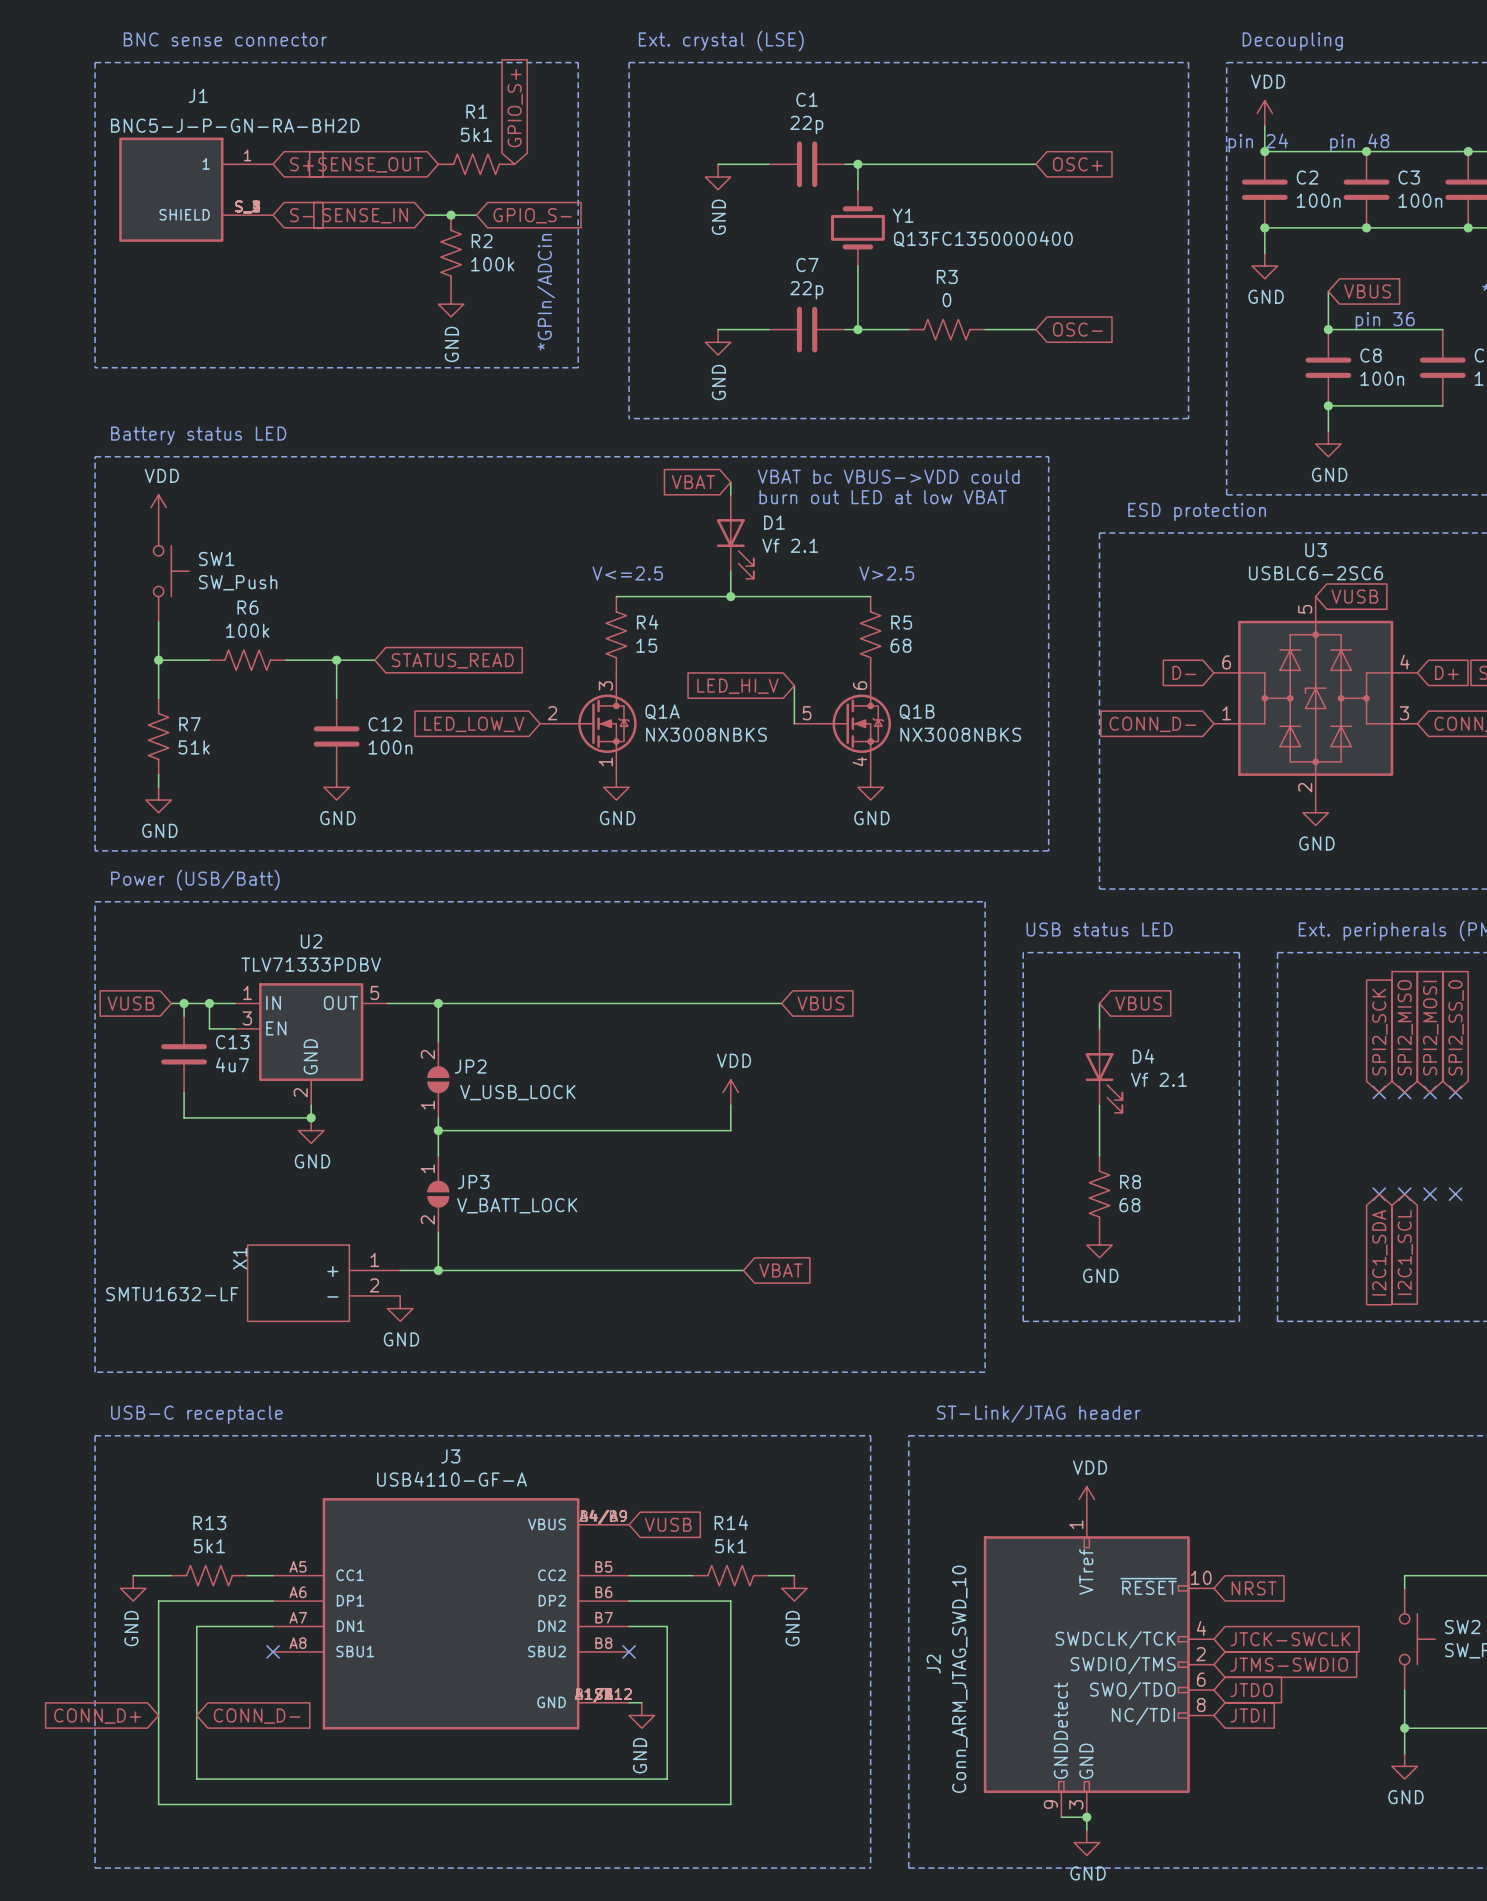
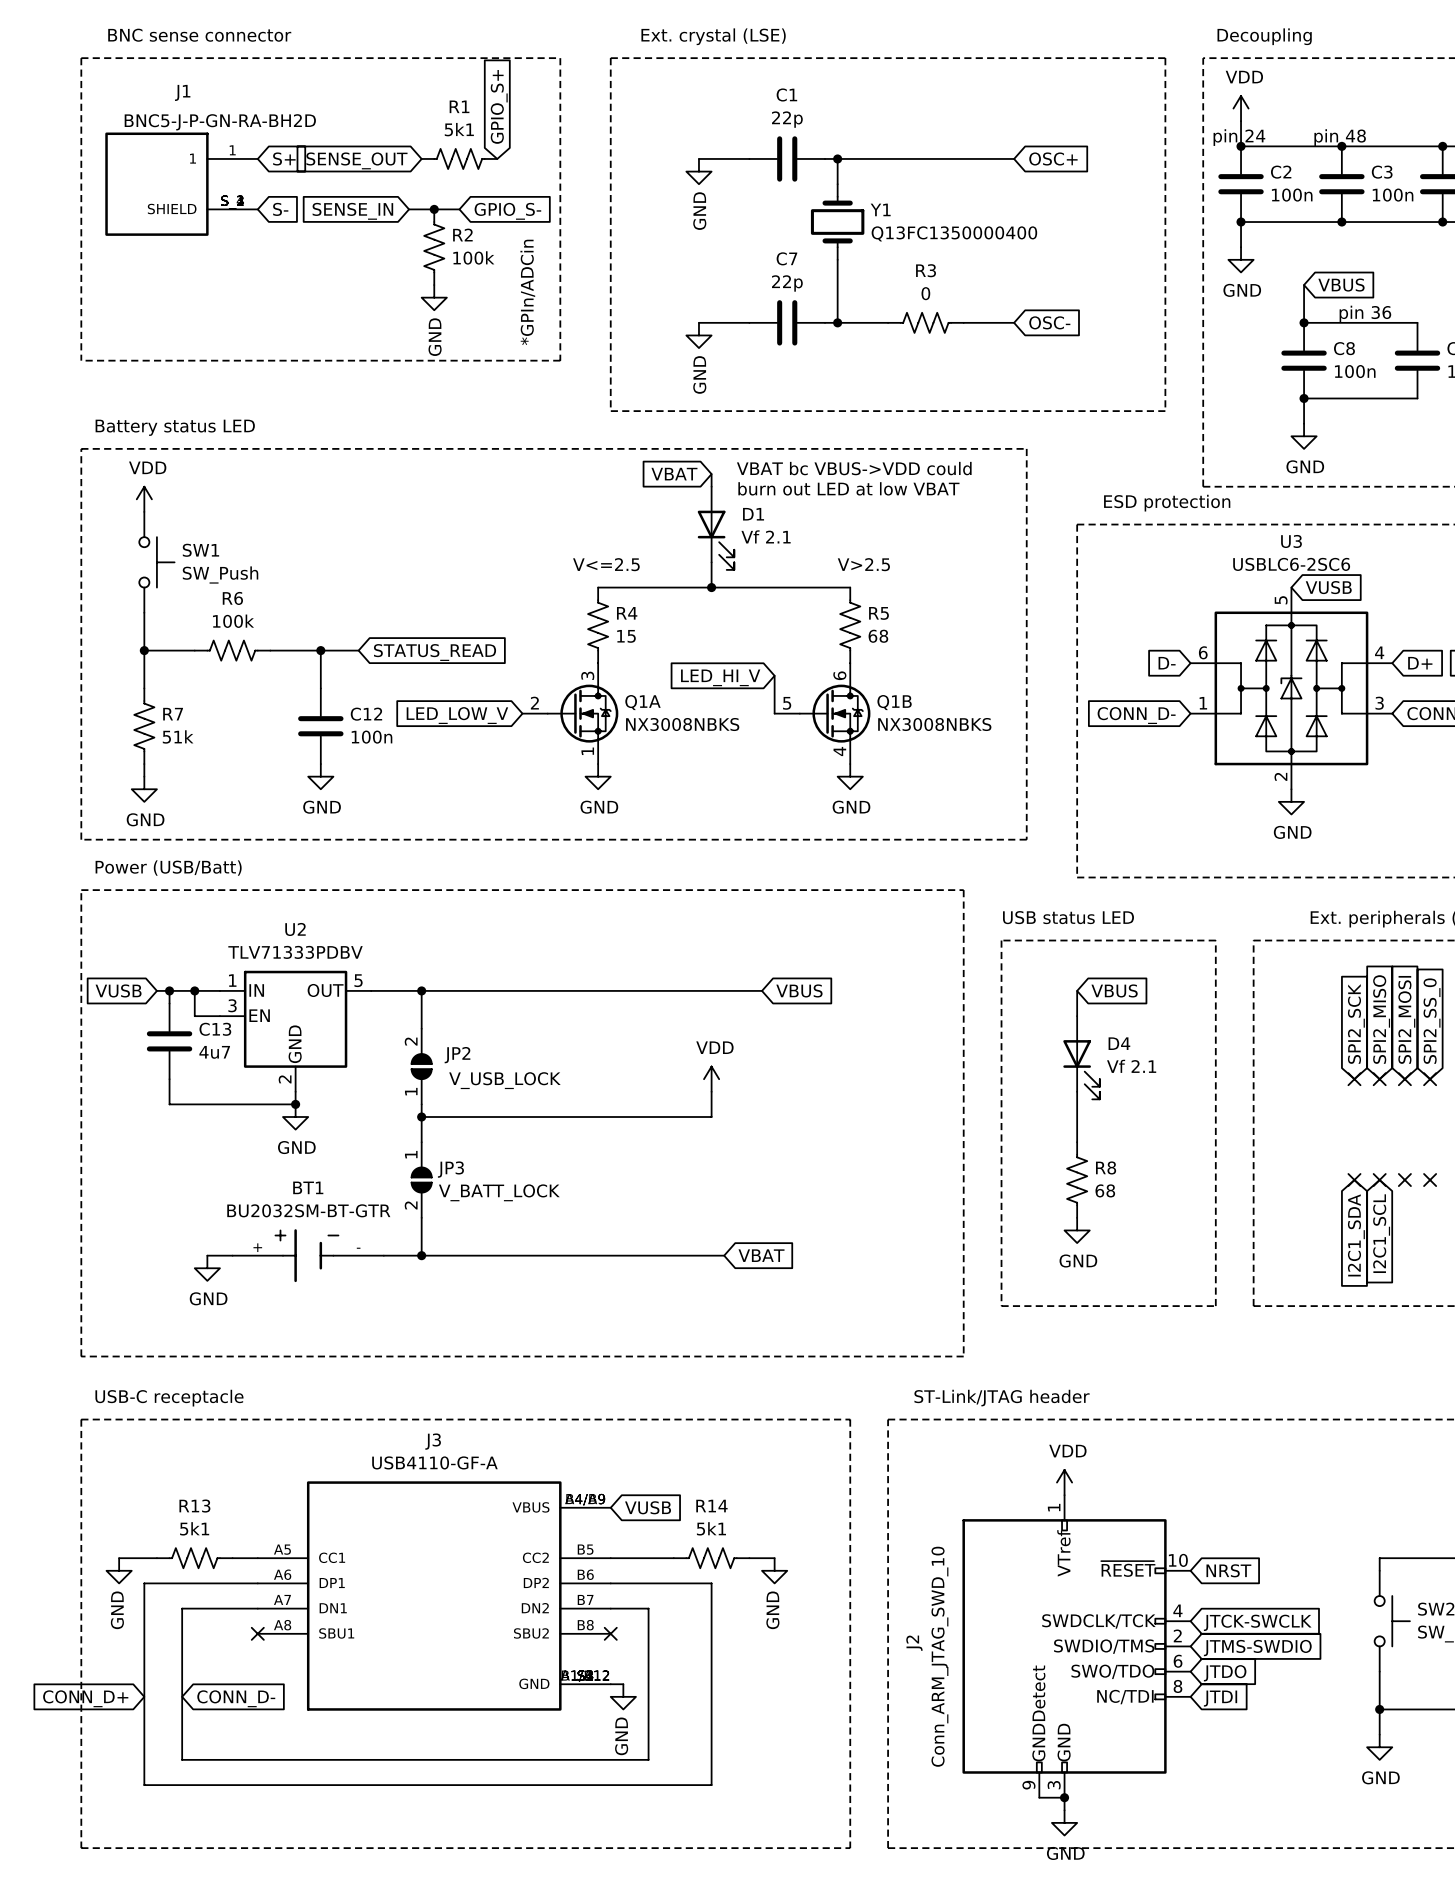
wire: none -> (207, 1255) (232, 1255)
BT1: none -> BU2032SM-BT-GTR (308, 1255)
X1: SMTU1632-LF (323, 1283) -> none
power symbol position: GND (400, 1308) -> GND (207, 1268)

